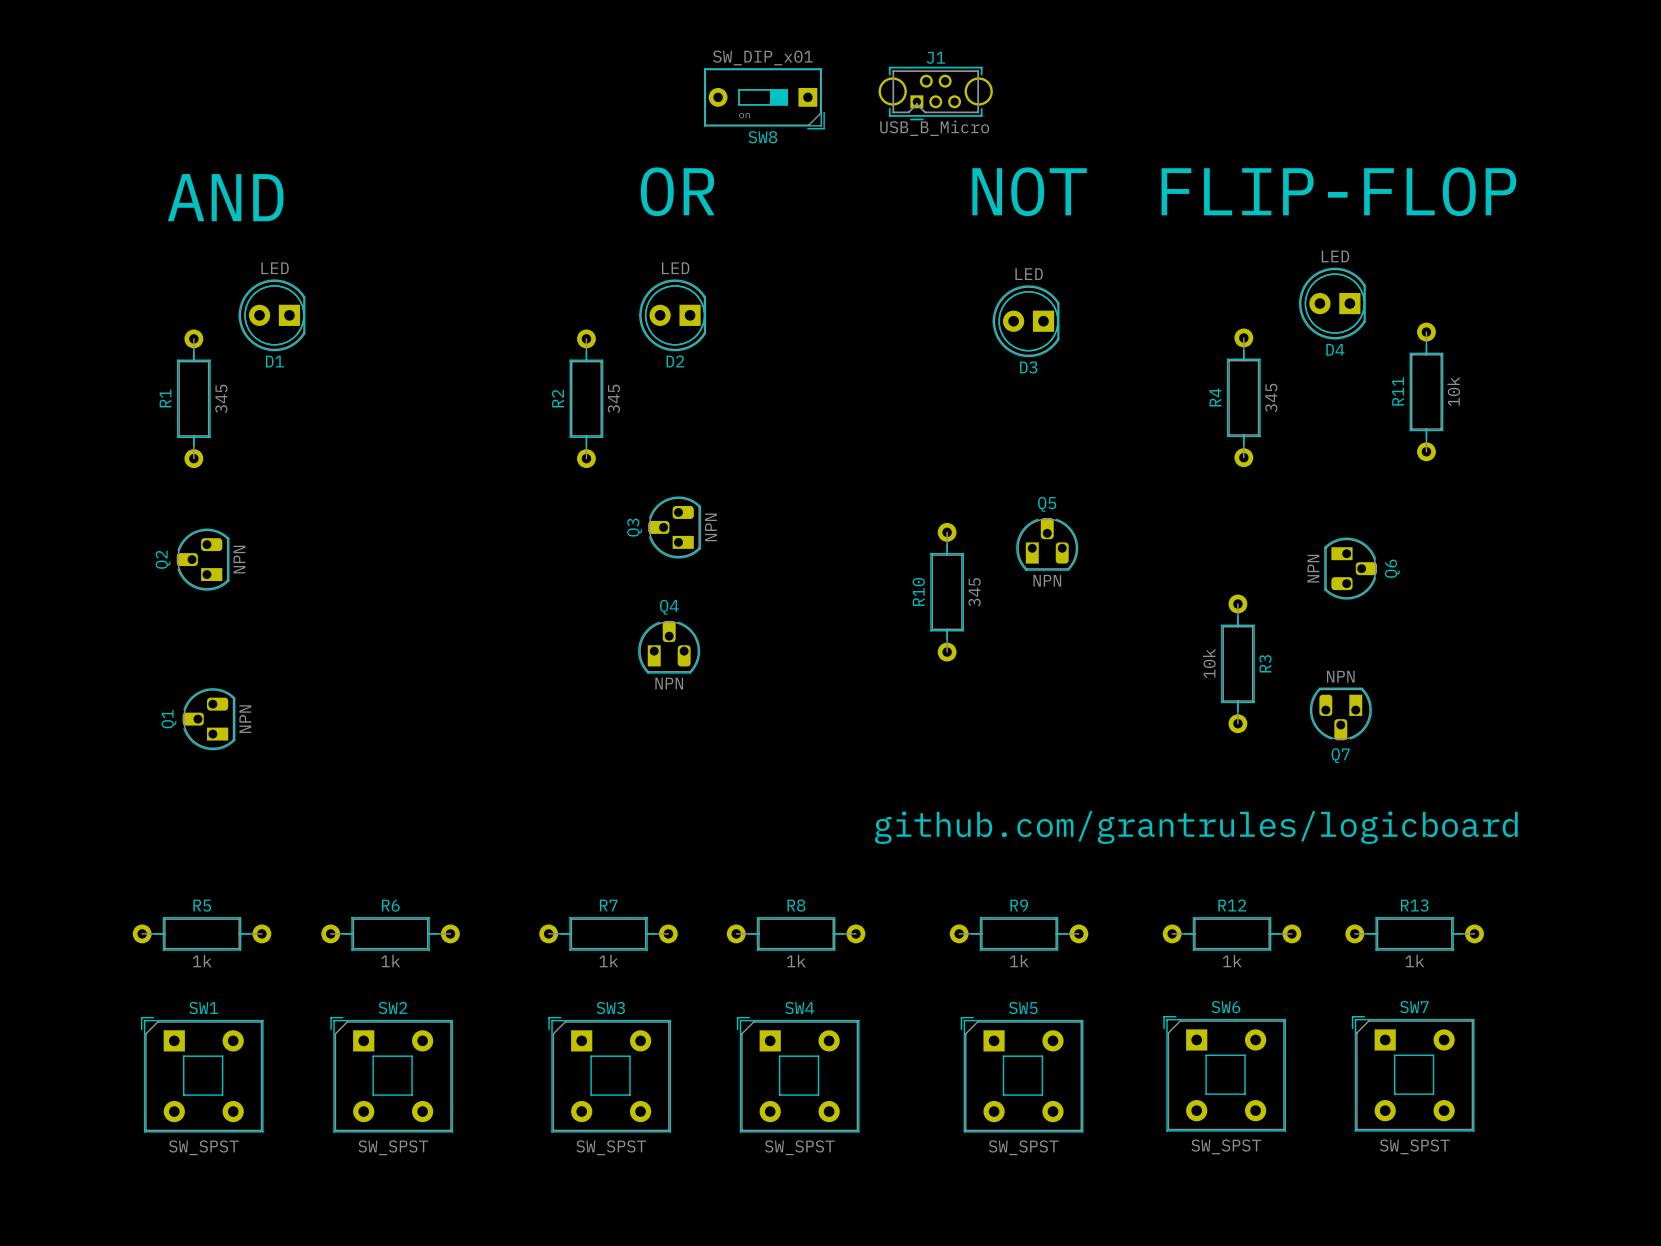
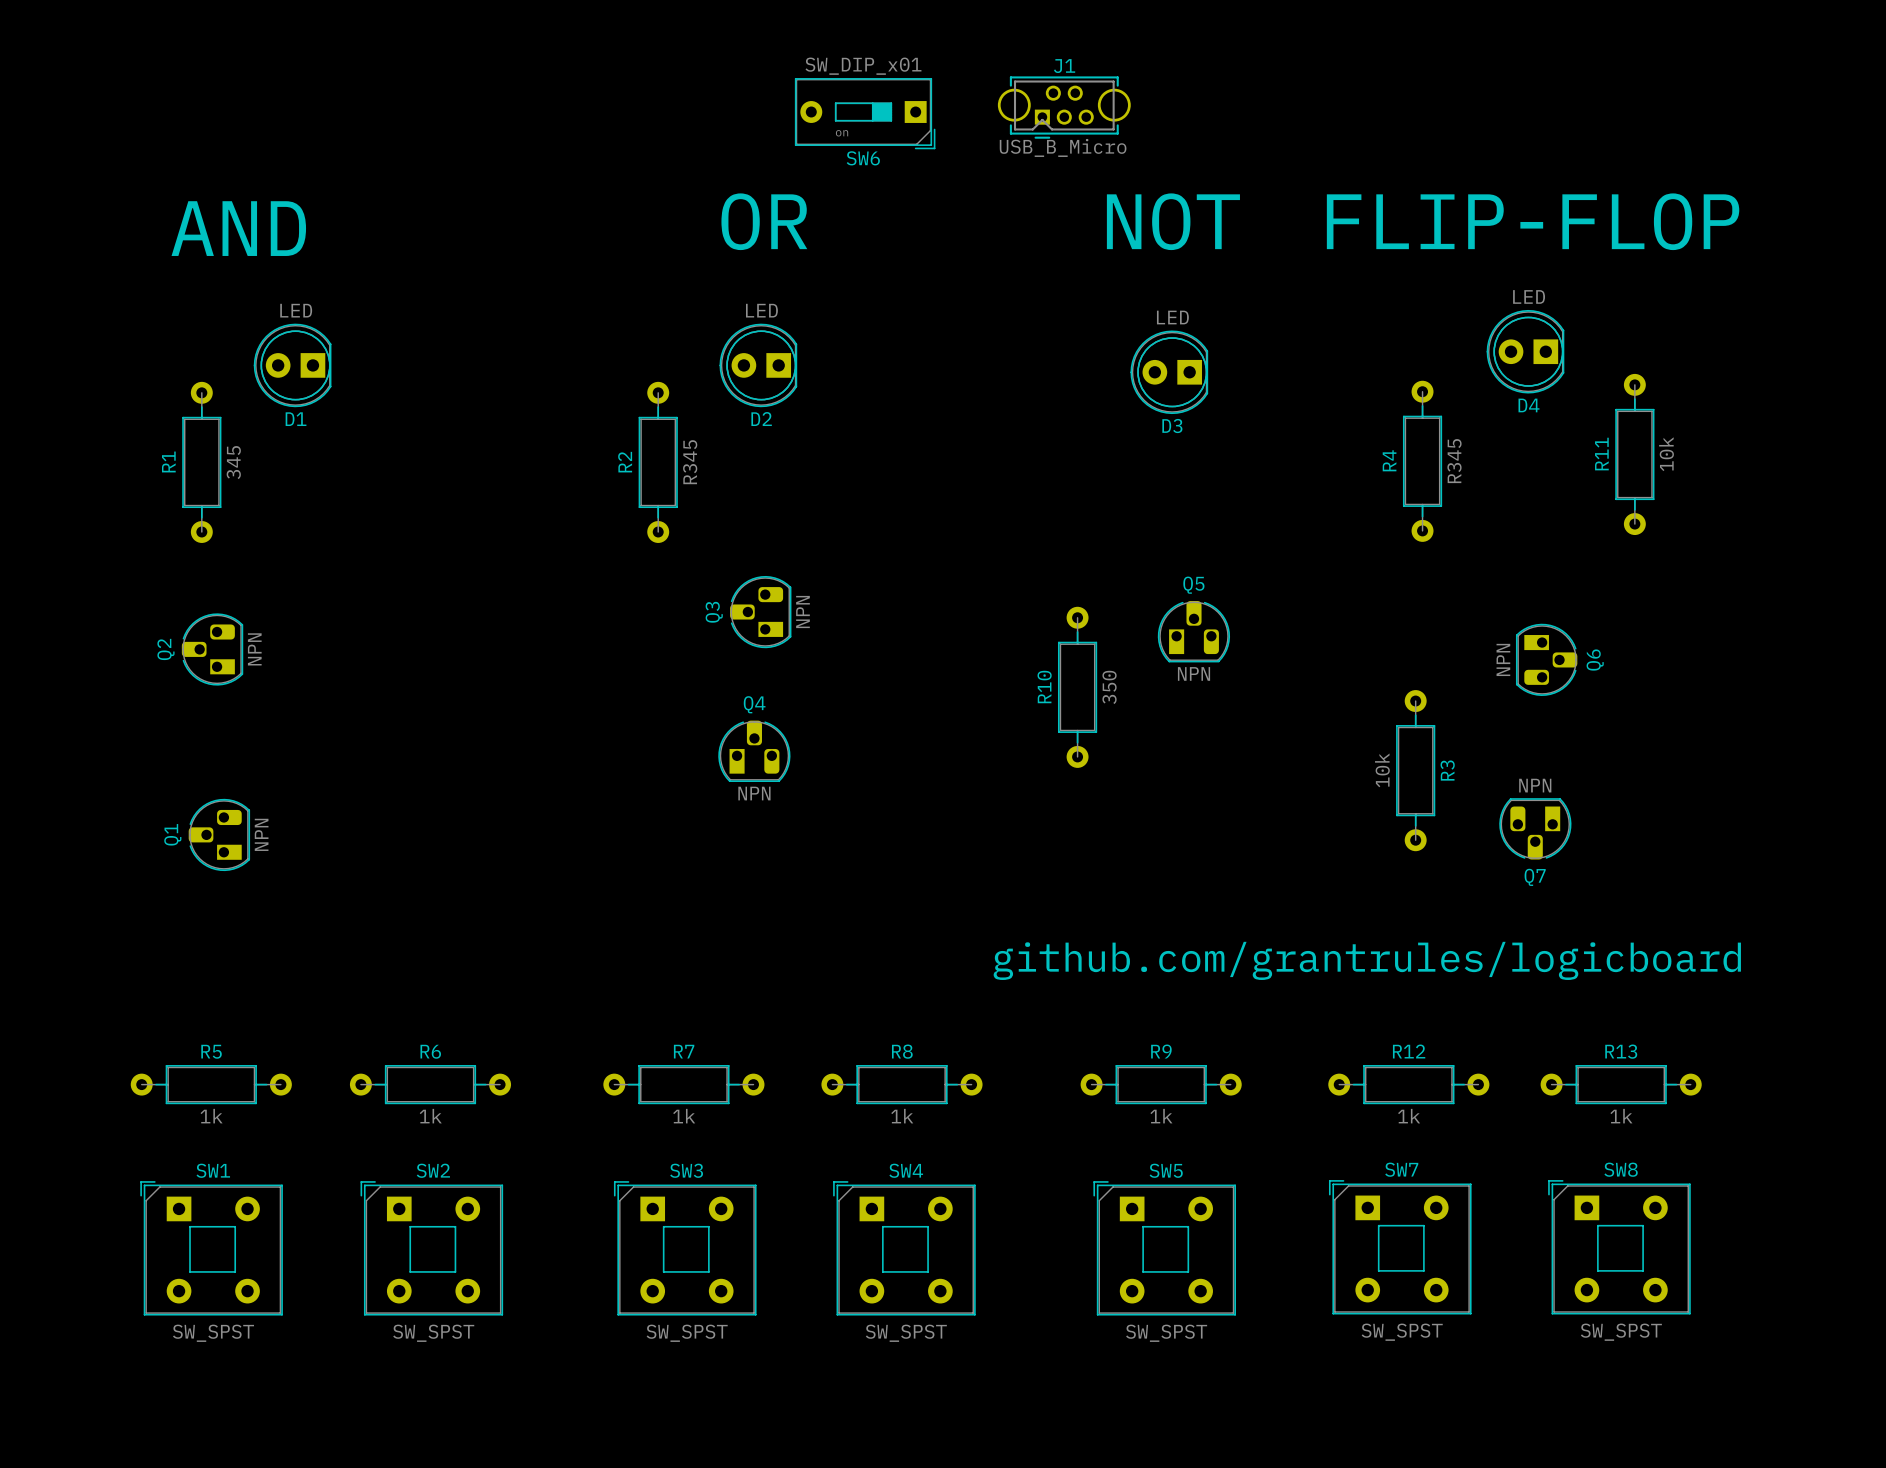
SW8 name: SW8 (762, 137) -> SW6 (863, 158)
R4 value: 345 (1271, 397) -> R345 (1454, 461)
R2 value: 345 (613, 398) -> R345 (690, 462)
R10 value: 345 (974, 592) -> 350 (1109, 687)
SW6 name: SW6 (1225, 1007) -> SW7 (1401, 1169)
SW7 name: SW7 (1414, 1007) -> SW8 (1621, 1169)

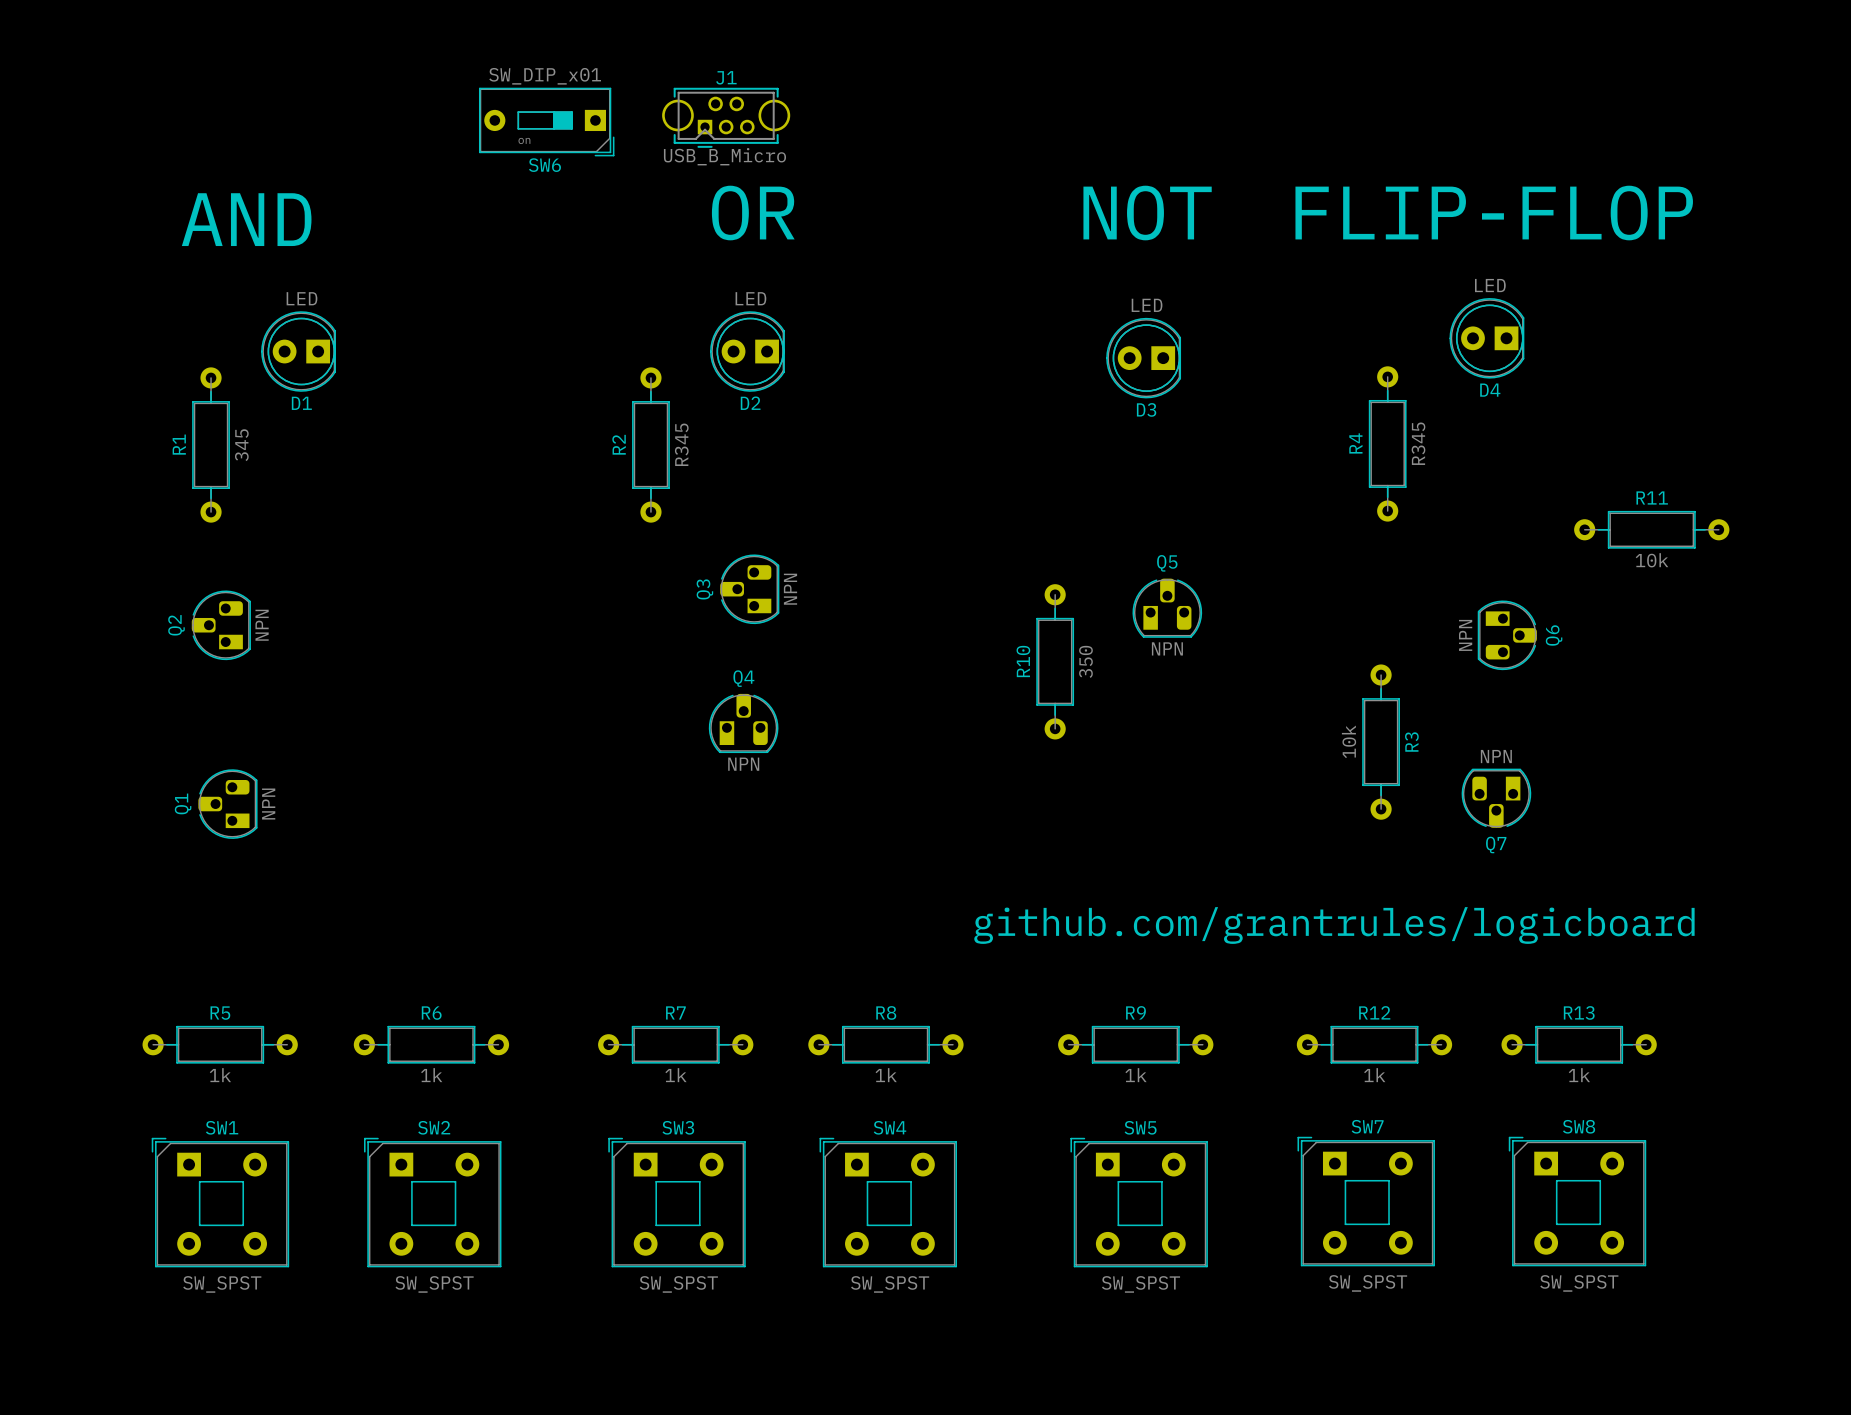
J1 position: (1064, 107) -> (726, 117)
SW6 position: (865, 113) -> (546, 122)
R11 rotation: 0° (1634, 454) -> 90° clockwise (1651, 529)
R11 position: (1634, 454) -> (1651, 529)

